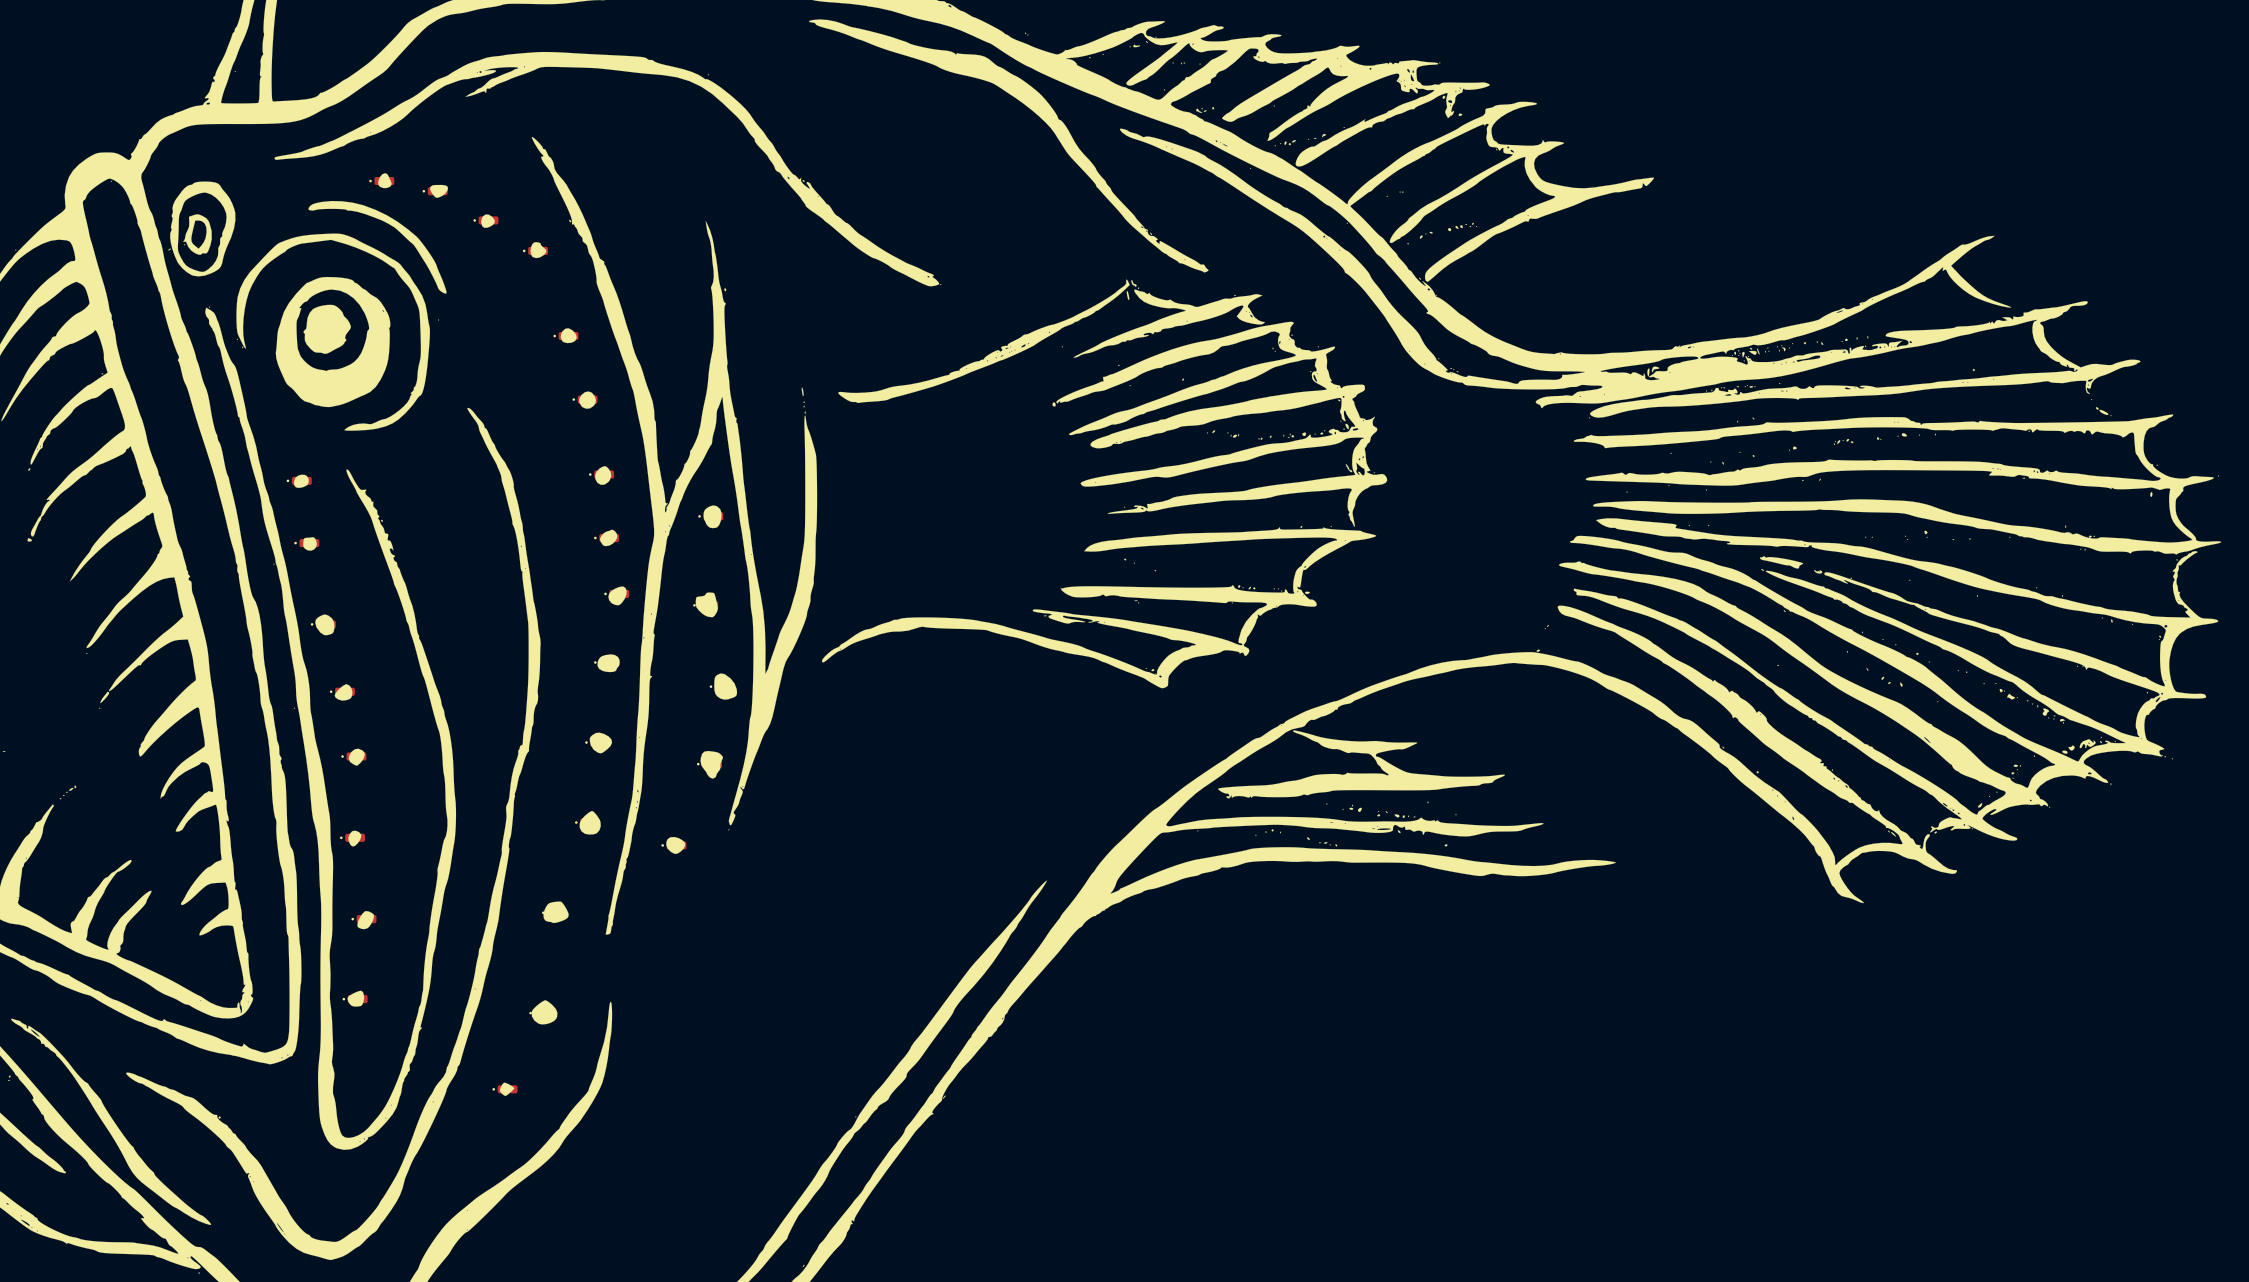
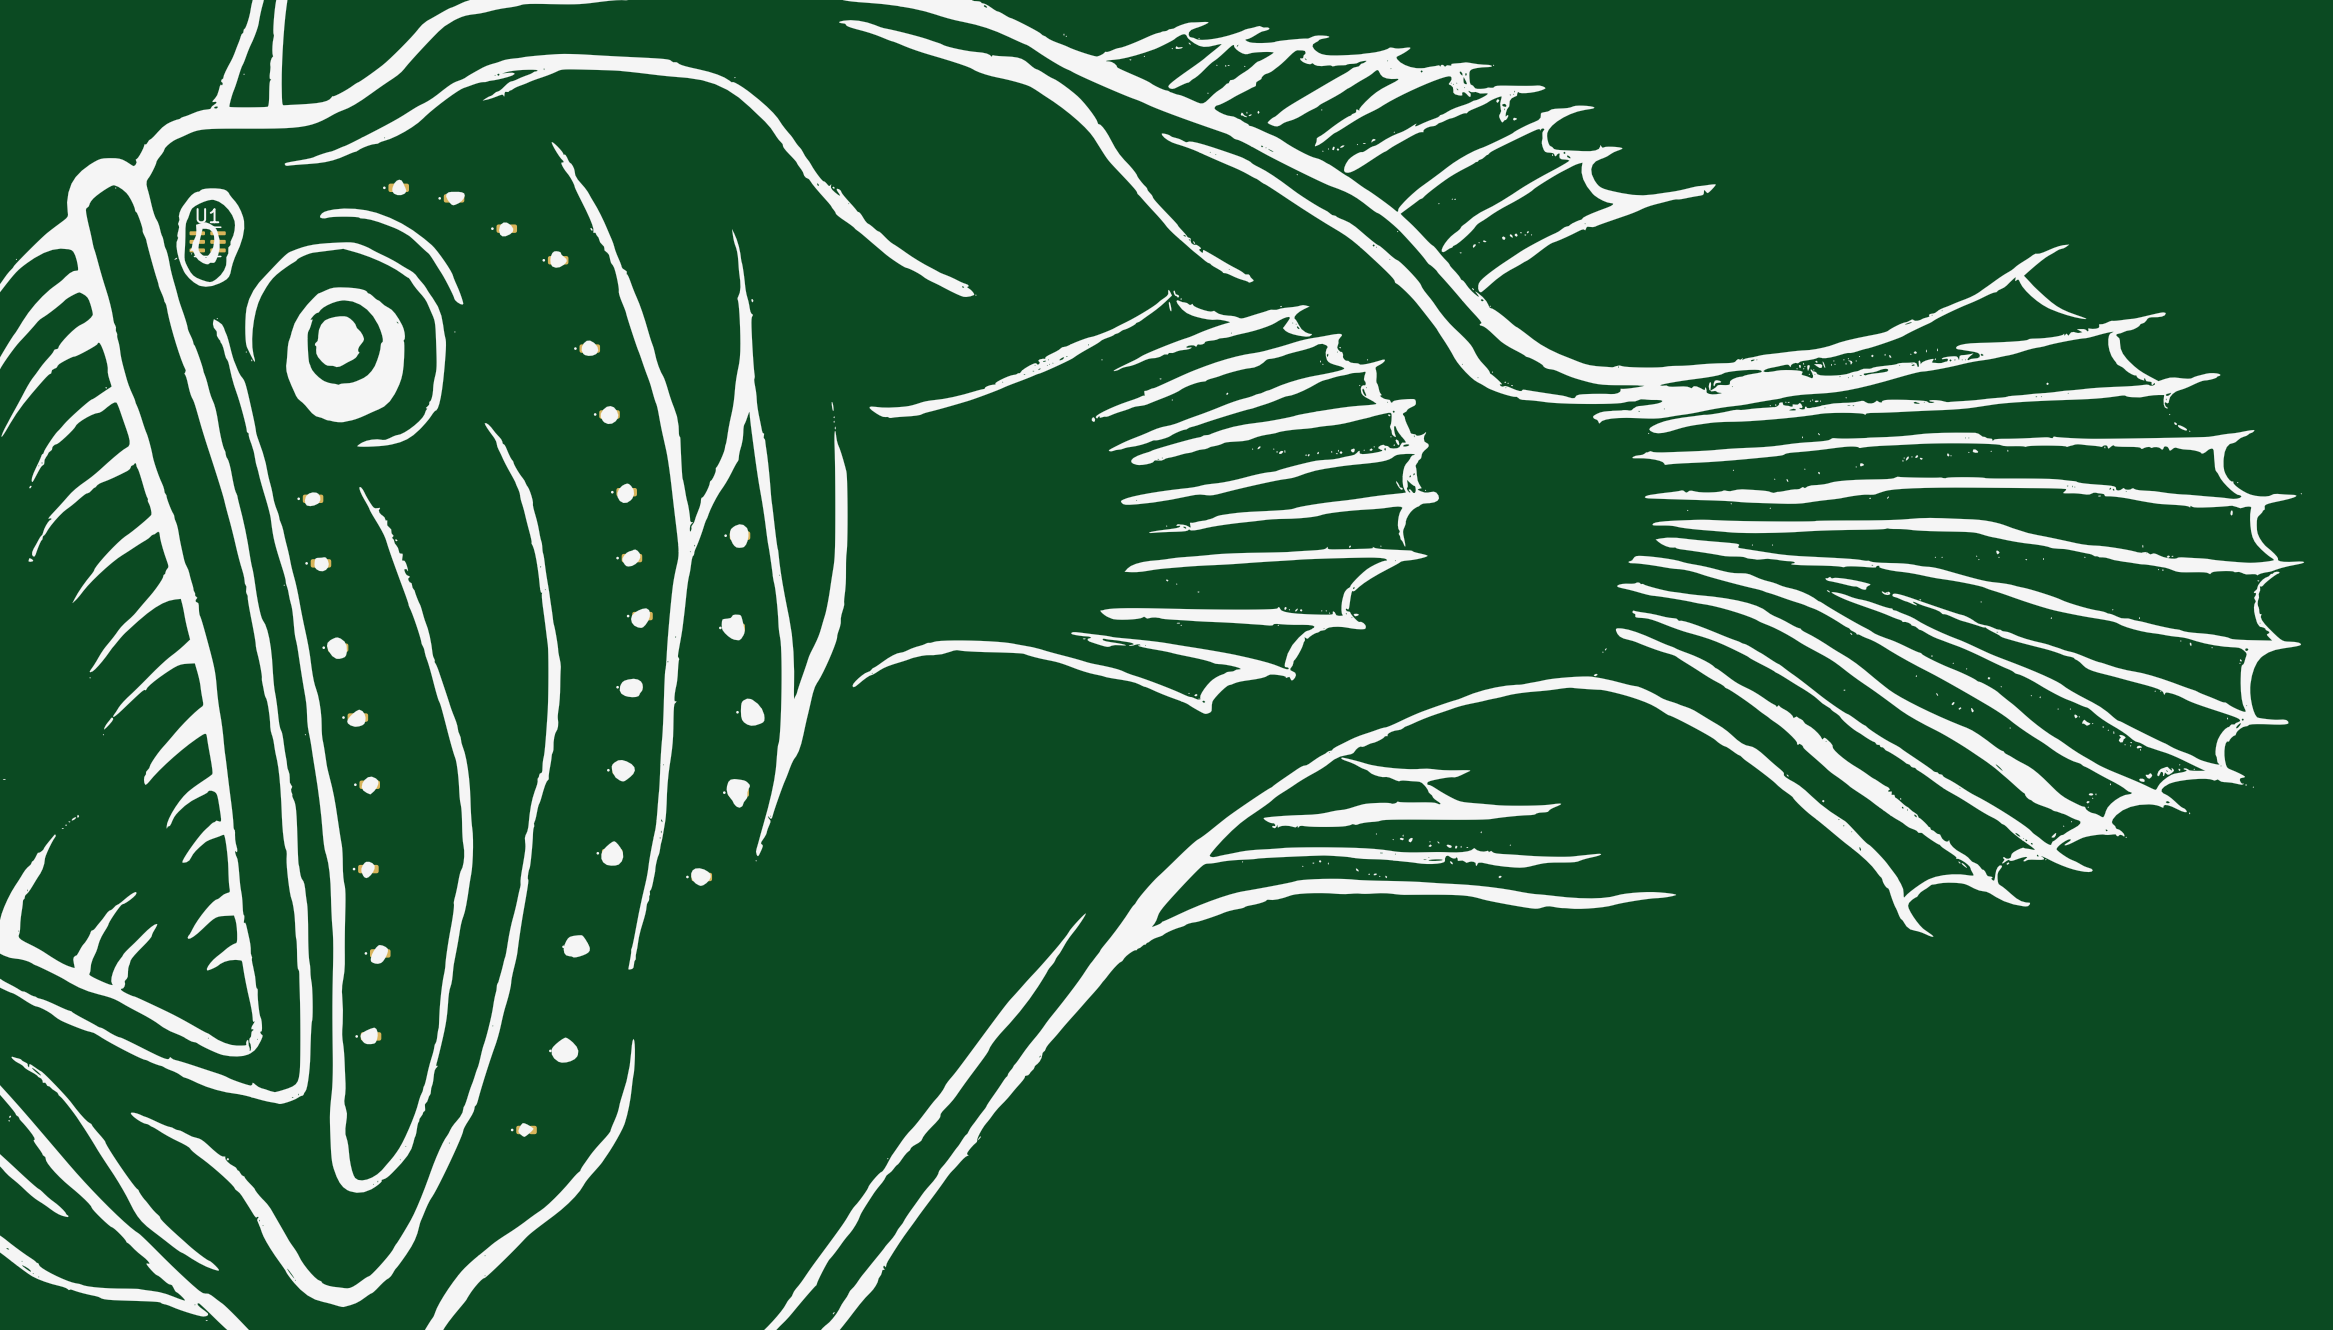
U1: none -> (207, 241)

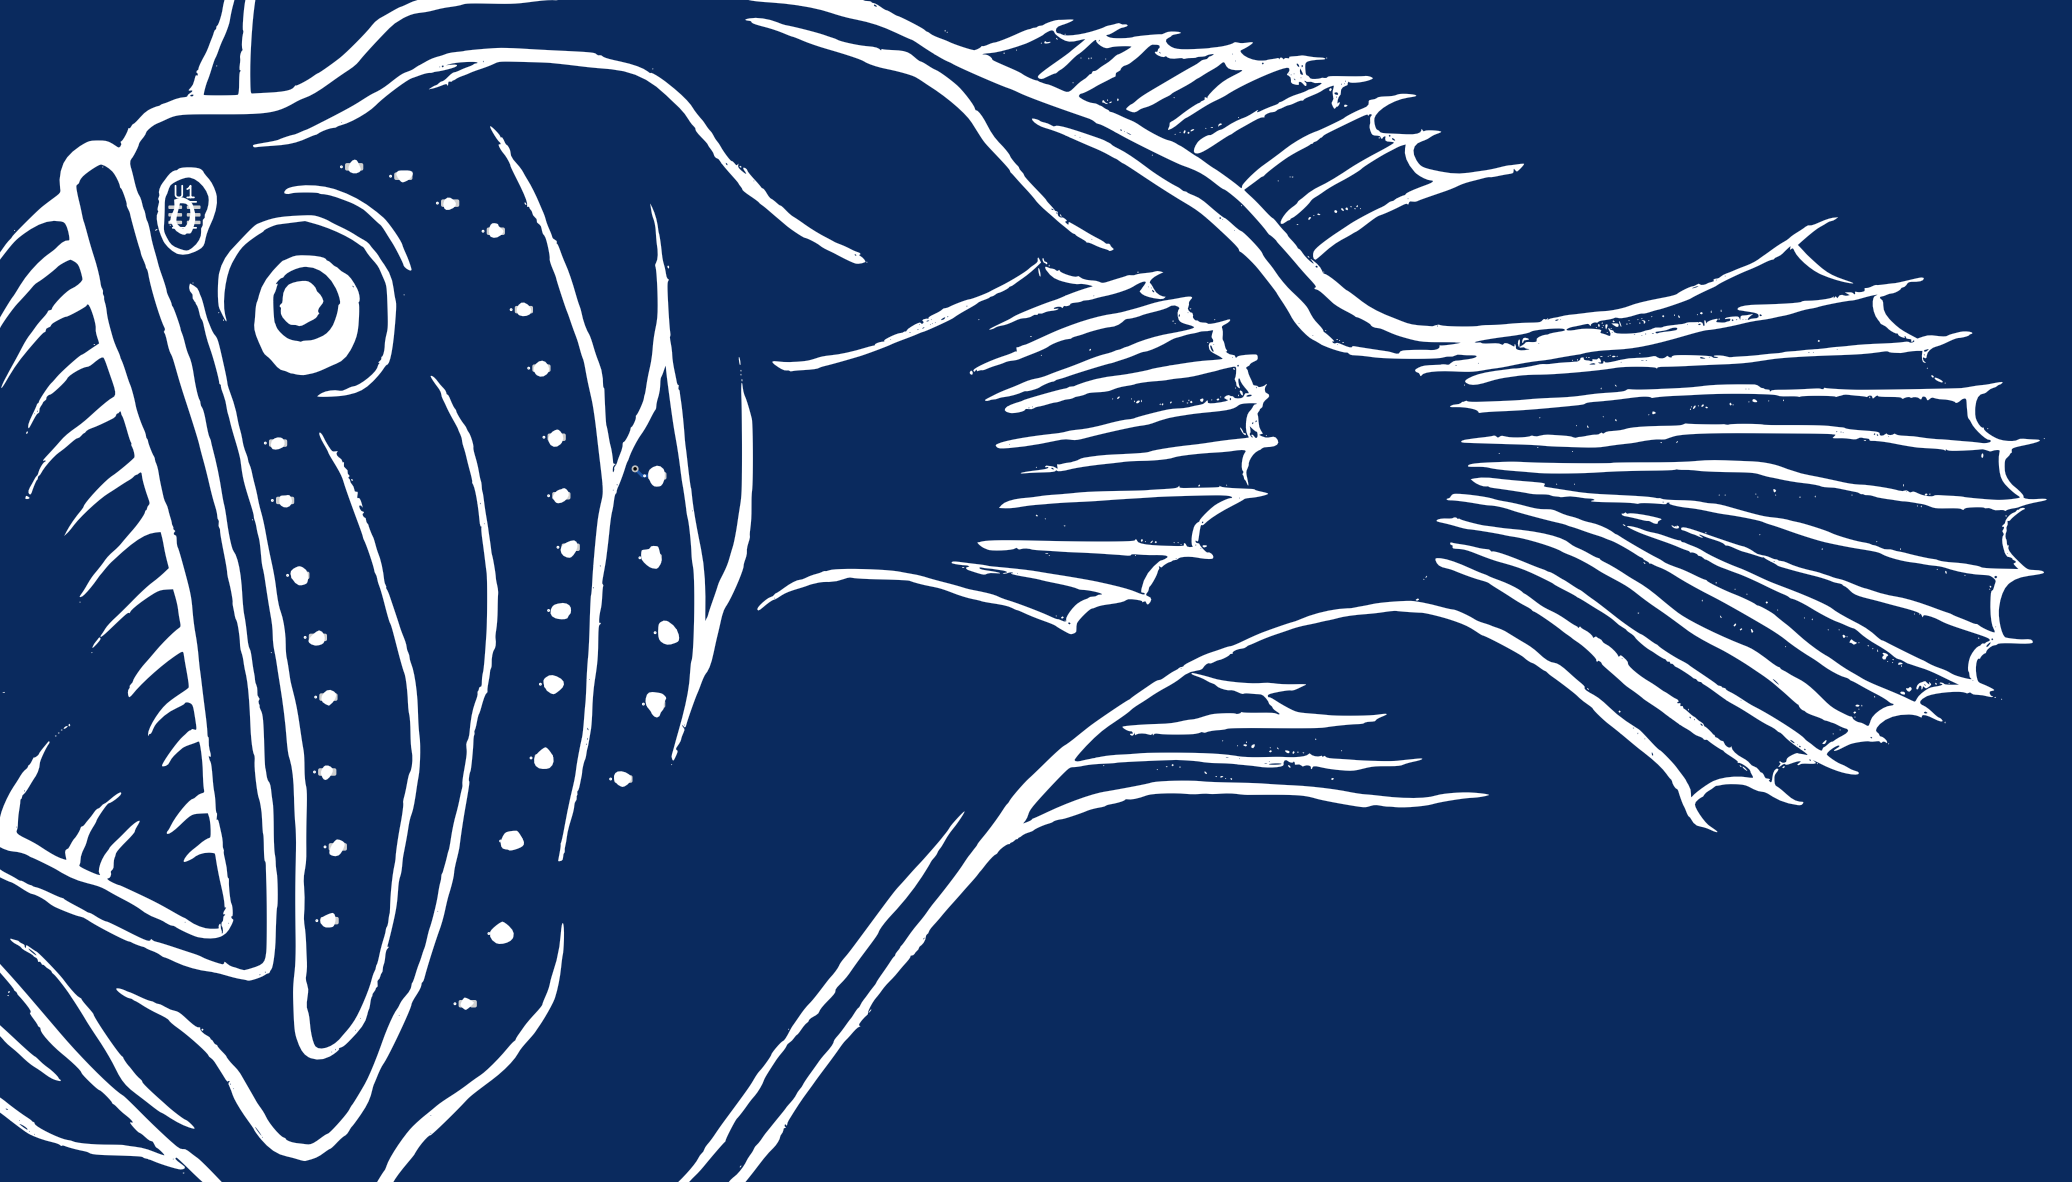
track: none -> (635, 468) (642, 475) (651, 475)
via: none -> (635, 468)

